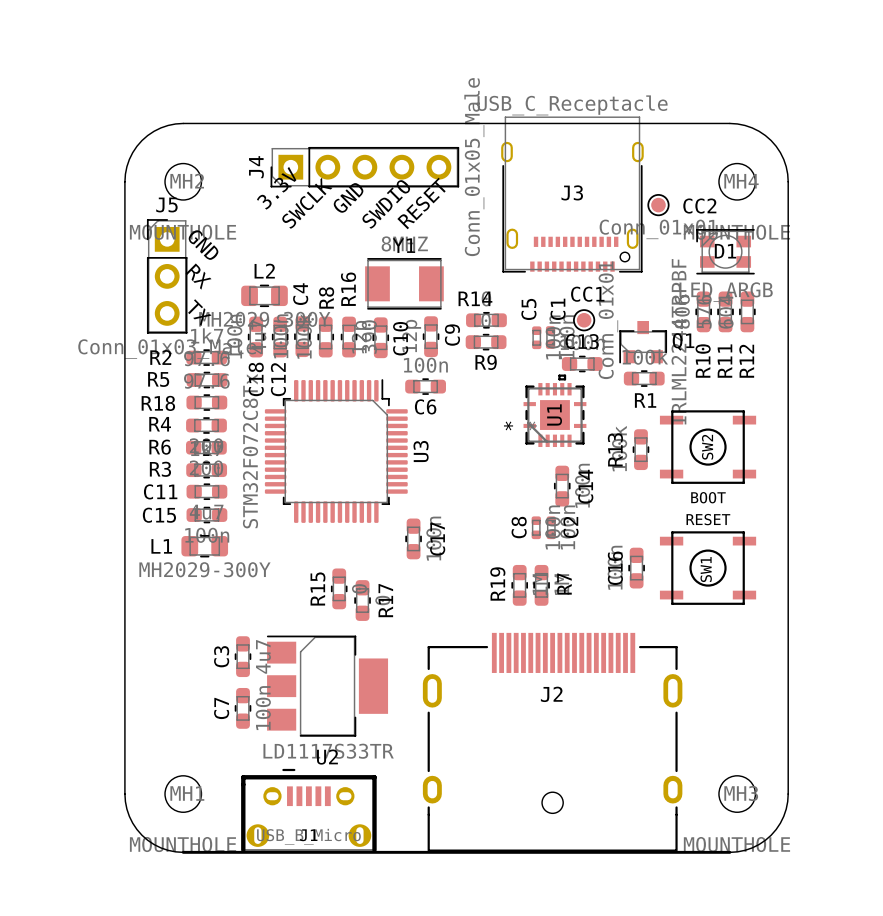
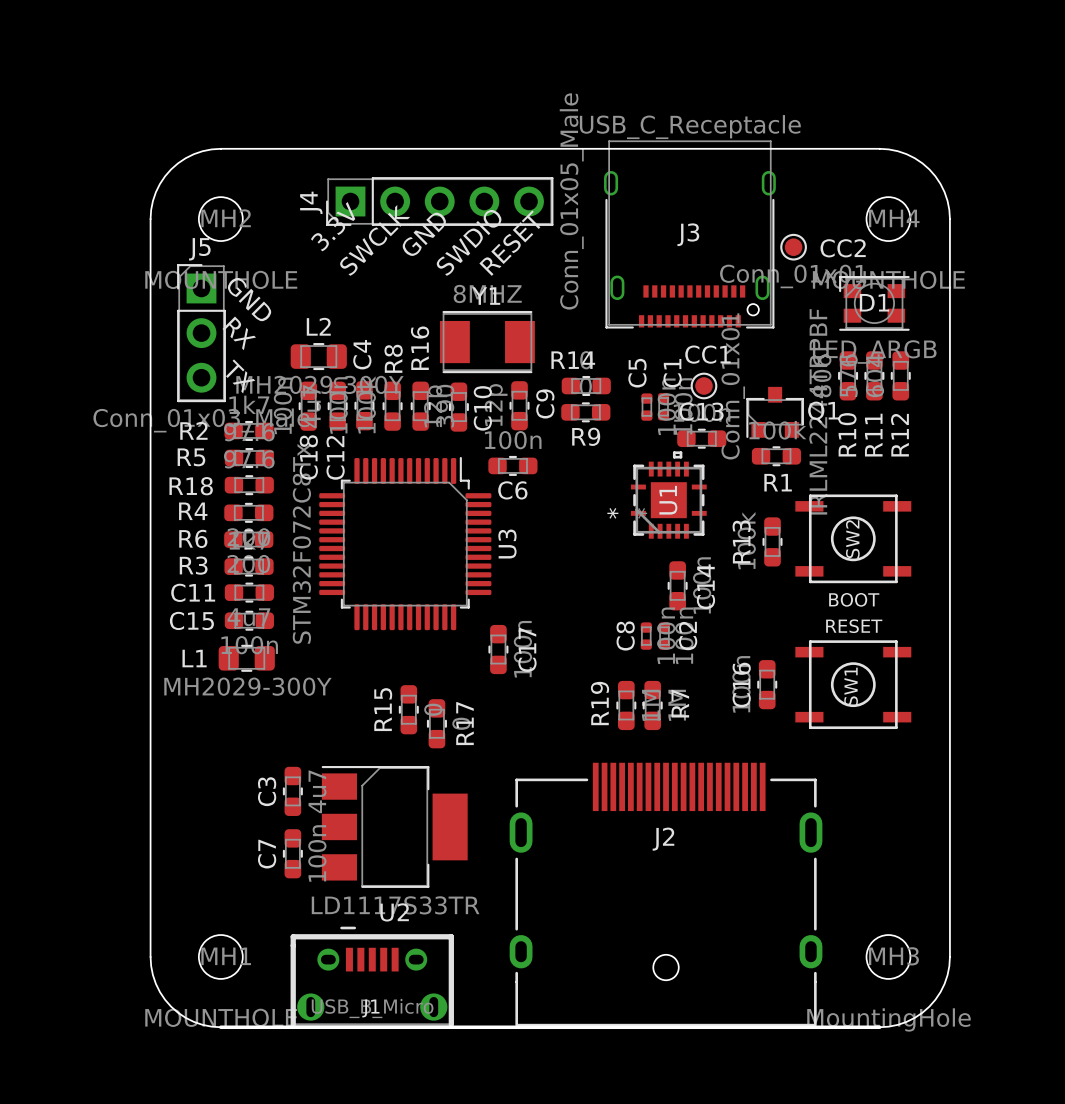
MH3 value: MOUNTHOLE (736, 844) -> MountingHole (889, 1019)

